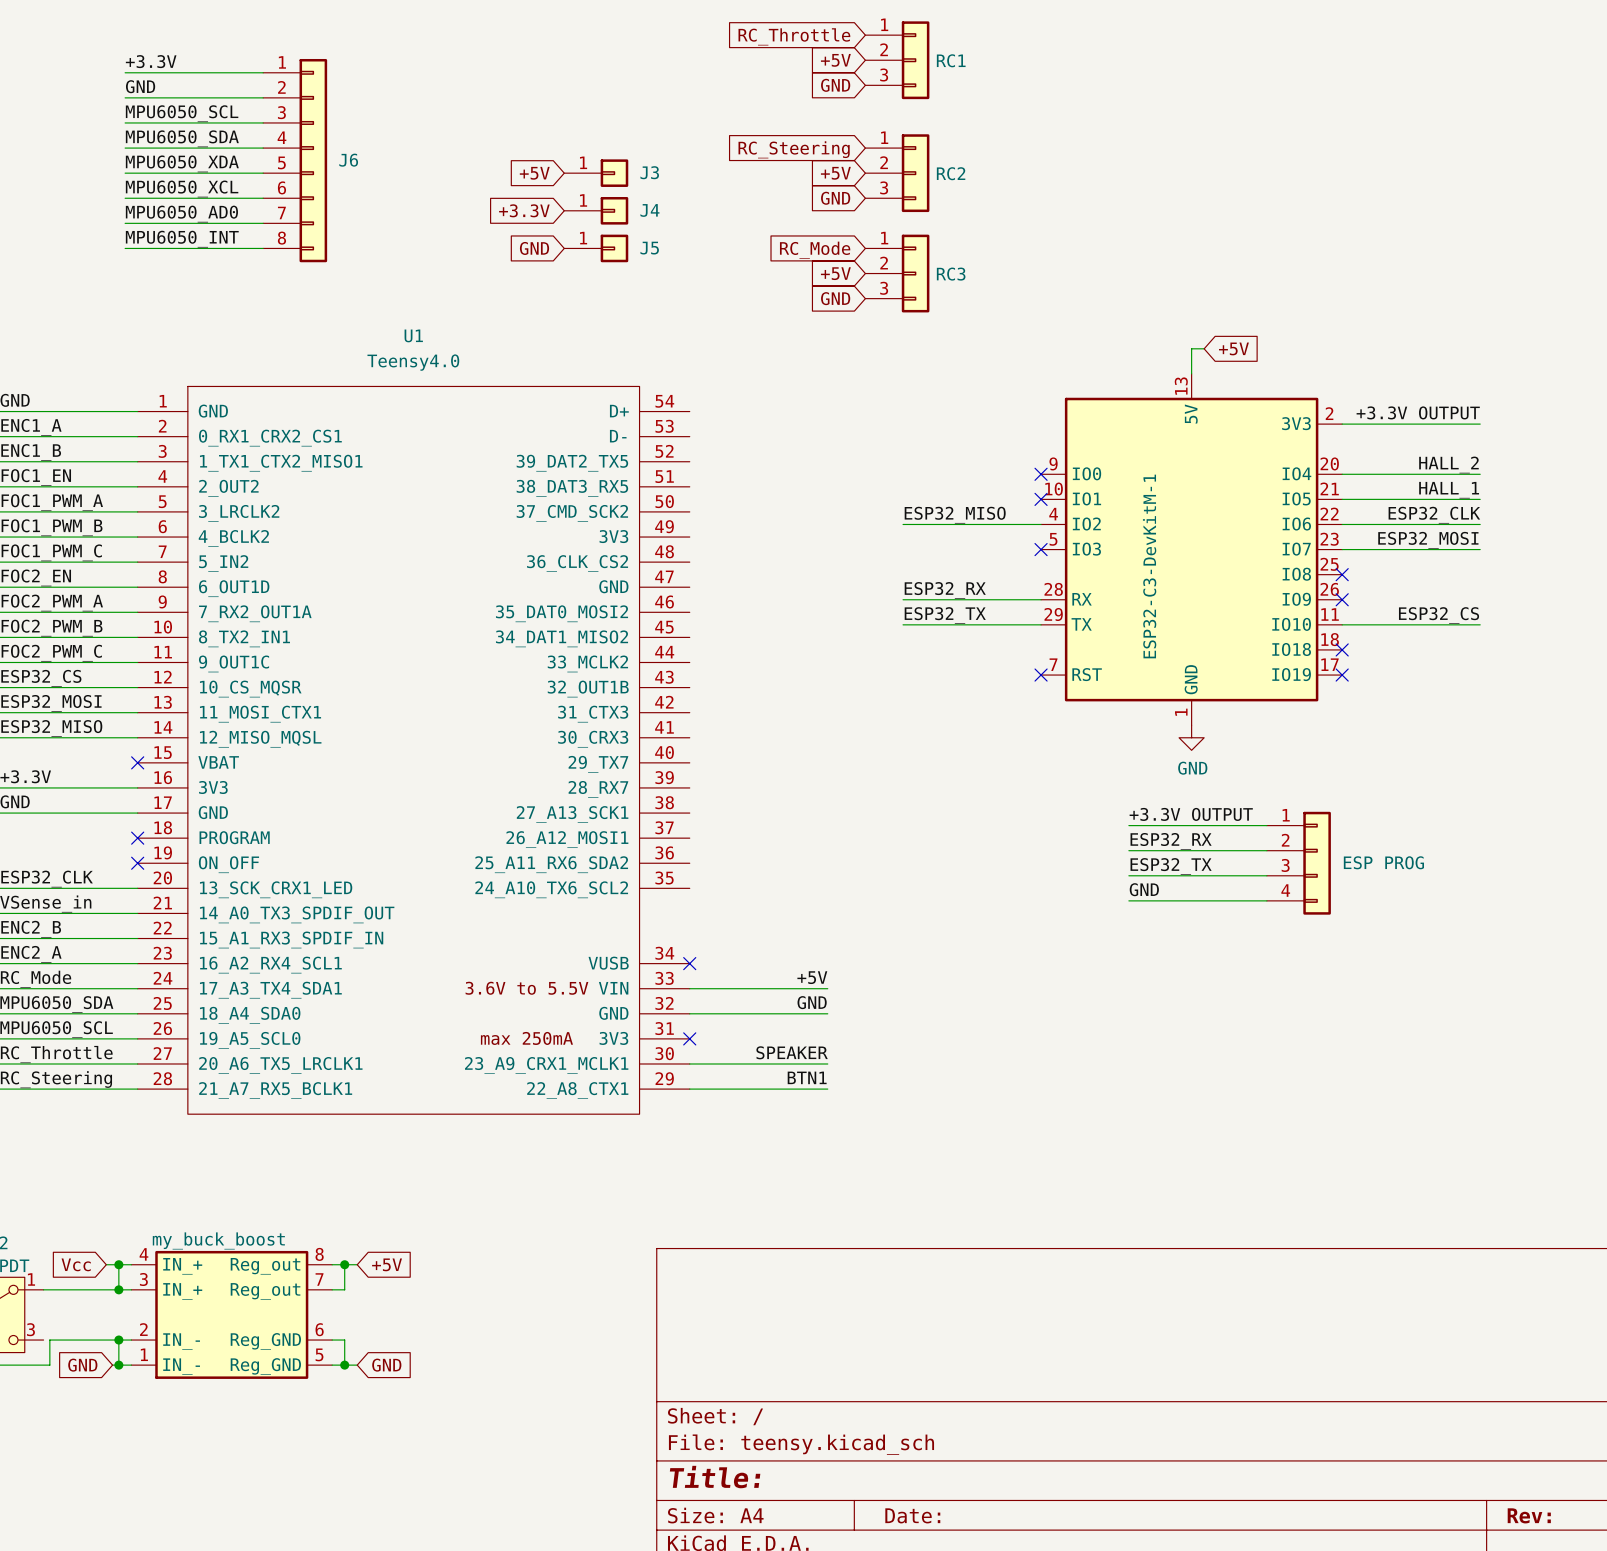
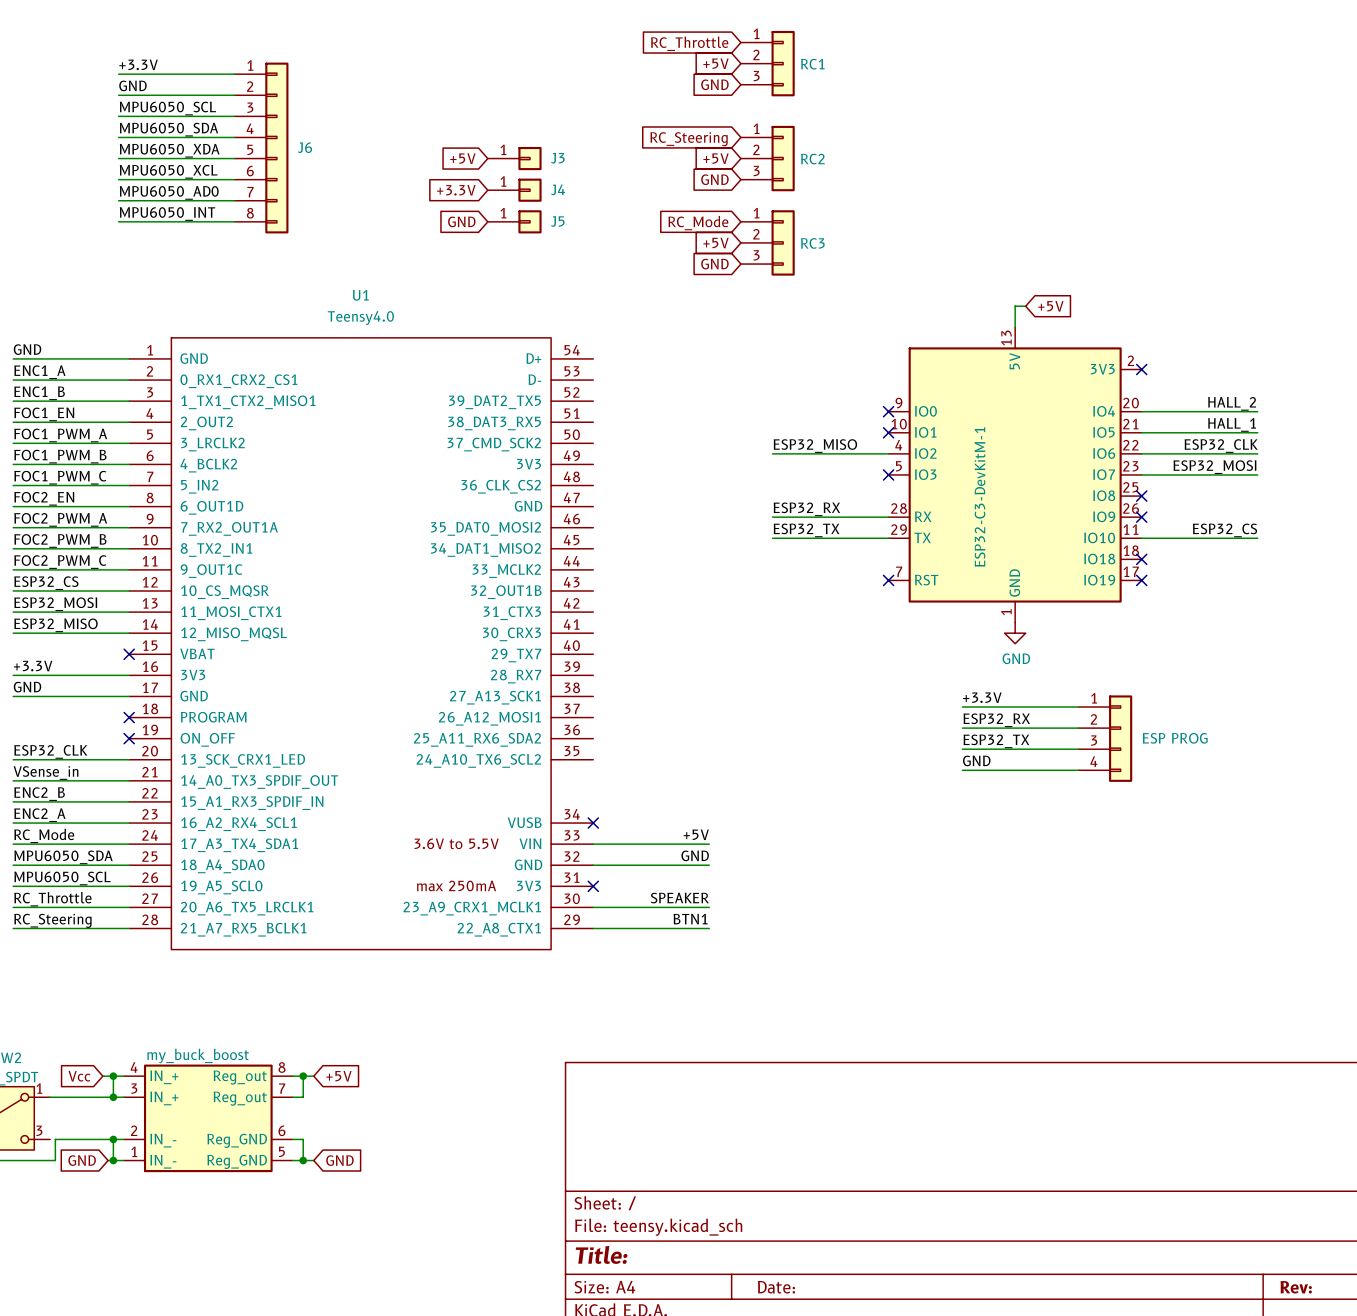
label: +3.3V OUTPUT (1418, 412) -> none
wire: (1342, 424) (1480, 424) -> none
no-connect mark: none -> (1141, 369)
label: +3.3V OUTPUT (1191, 814) -> +3.3V (982, 697)

